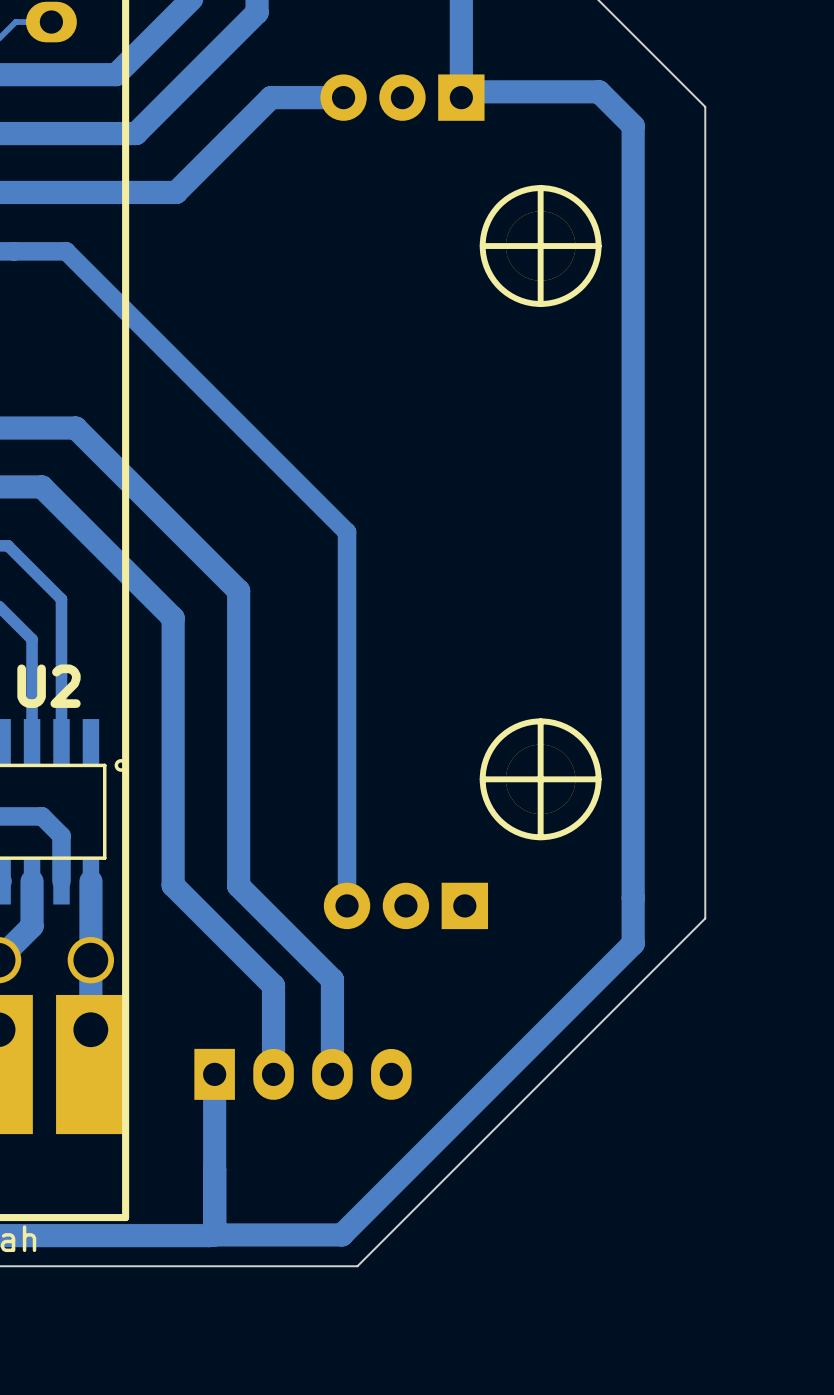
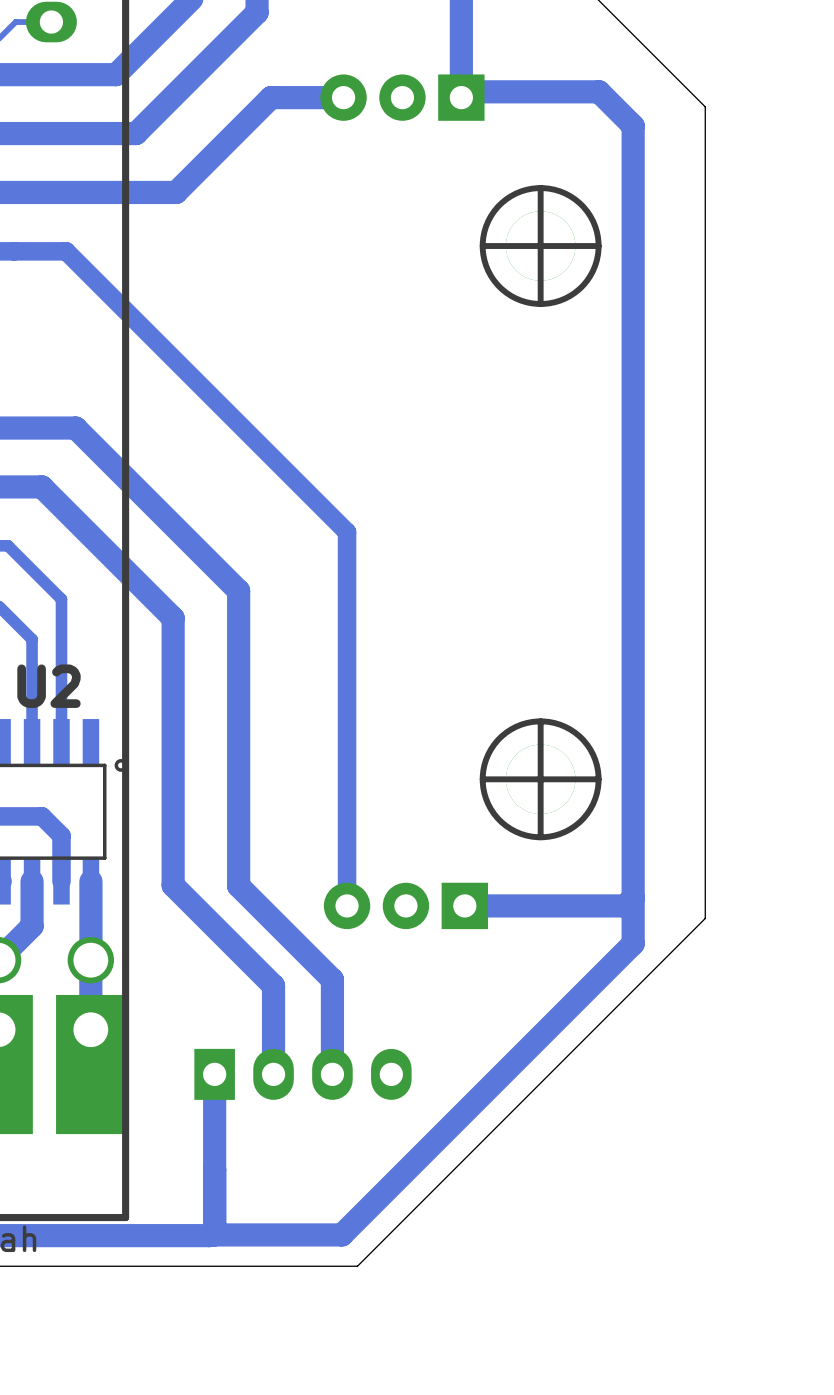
track: none -> (633, 898) (625, 905) (464, 905)

